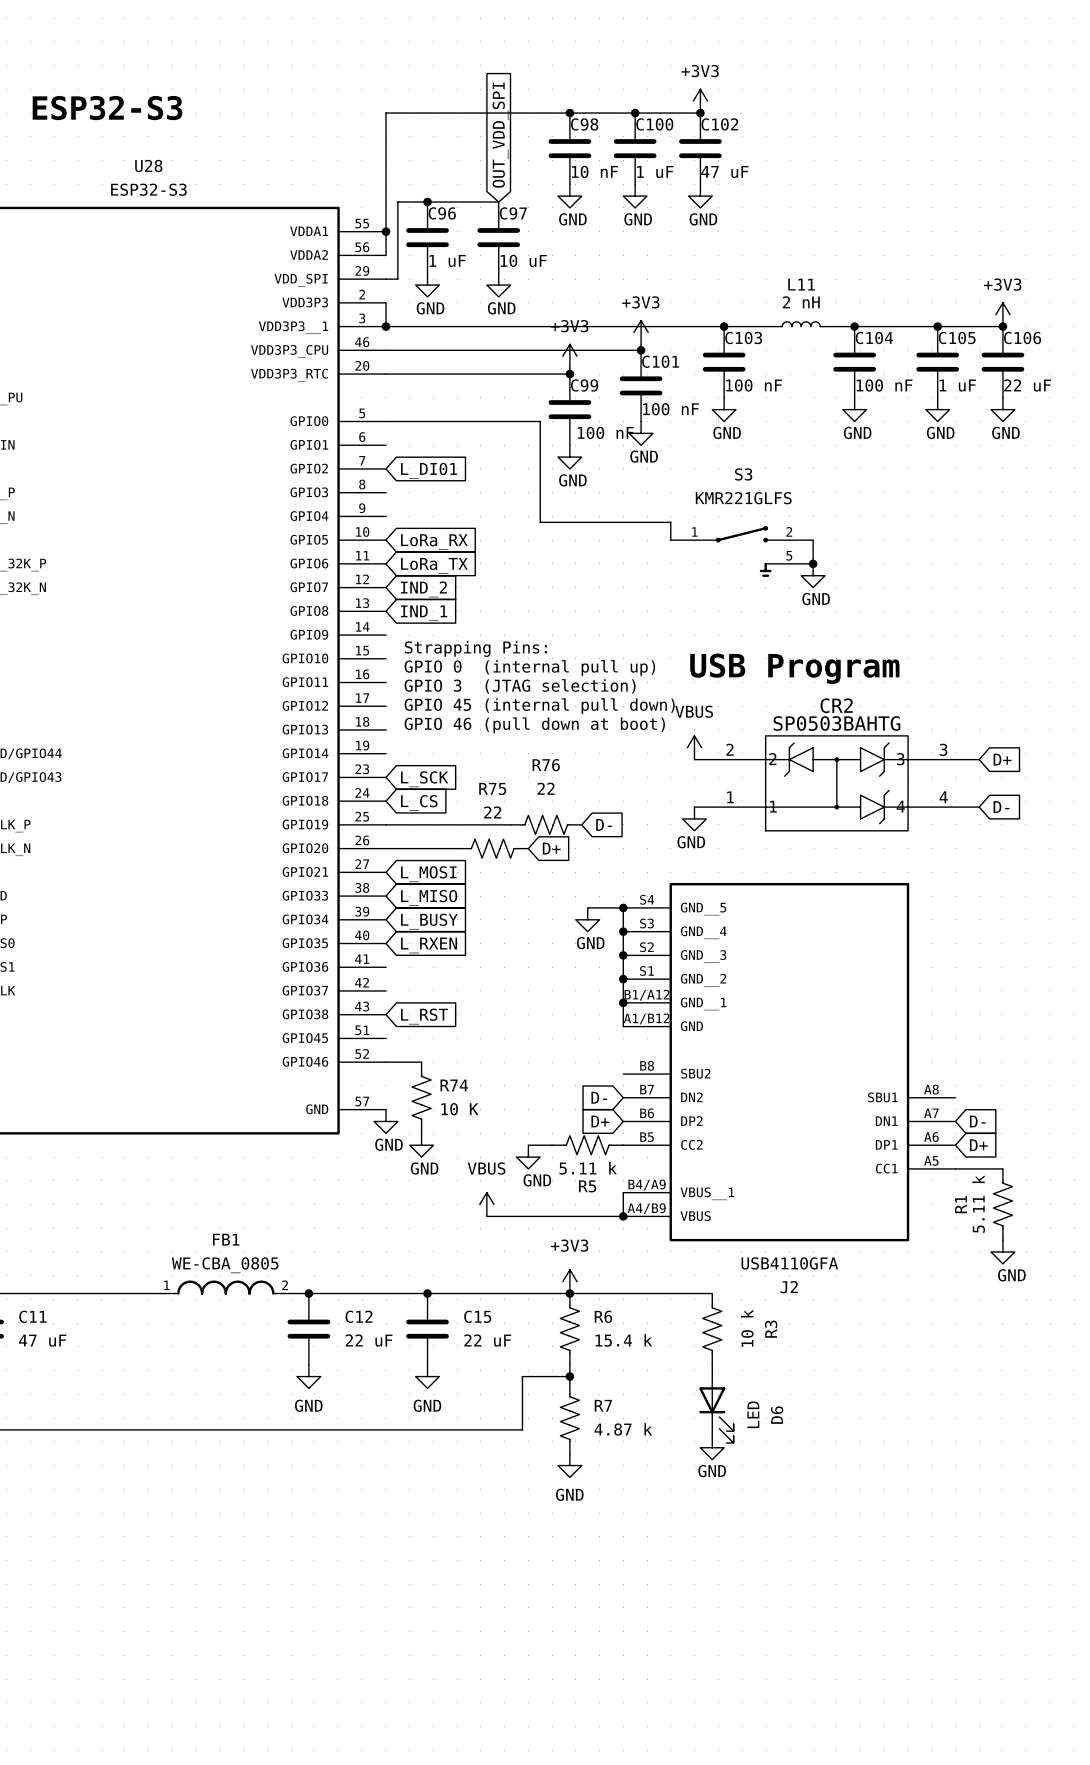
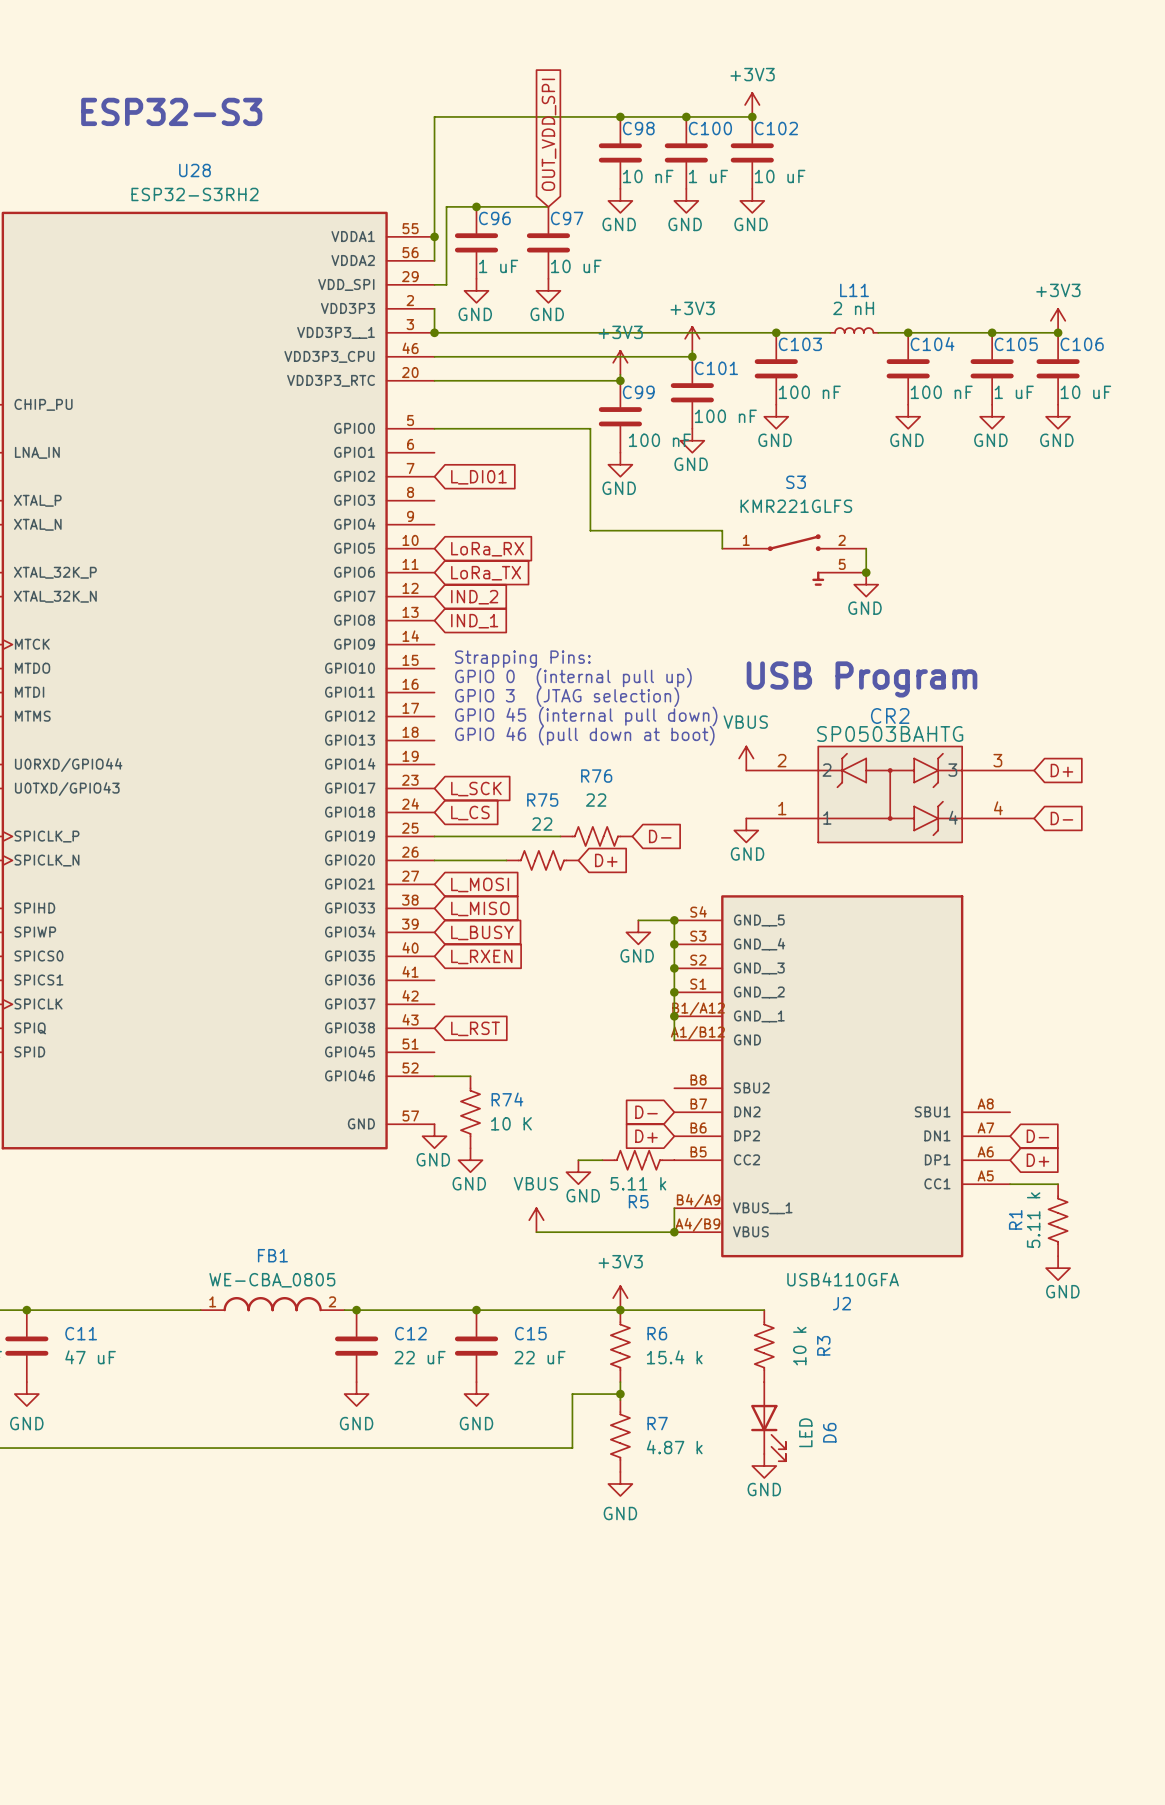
C102 value: 47 uF (724, 172) -> 10 uF (780, 176)
U28 value: ESP32-S3 (148, 189) -> ESP32-S3RH2 (194, 194)
C106 value: 22 uF (1027, 385) -> 10 uF (1085, 392)

